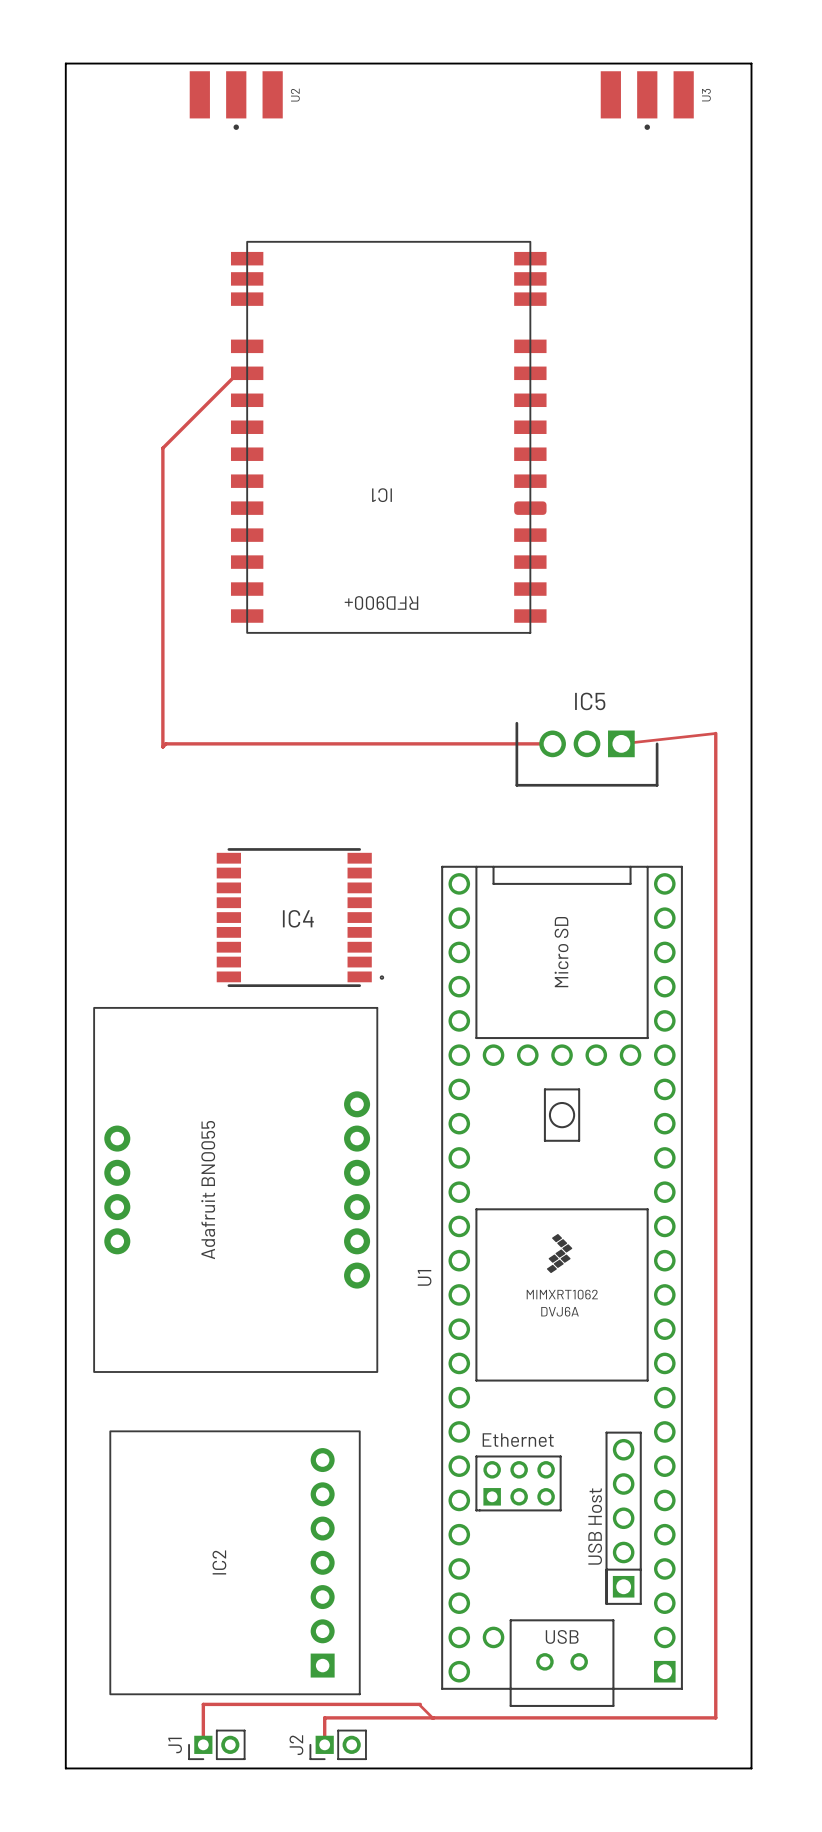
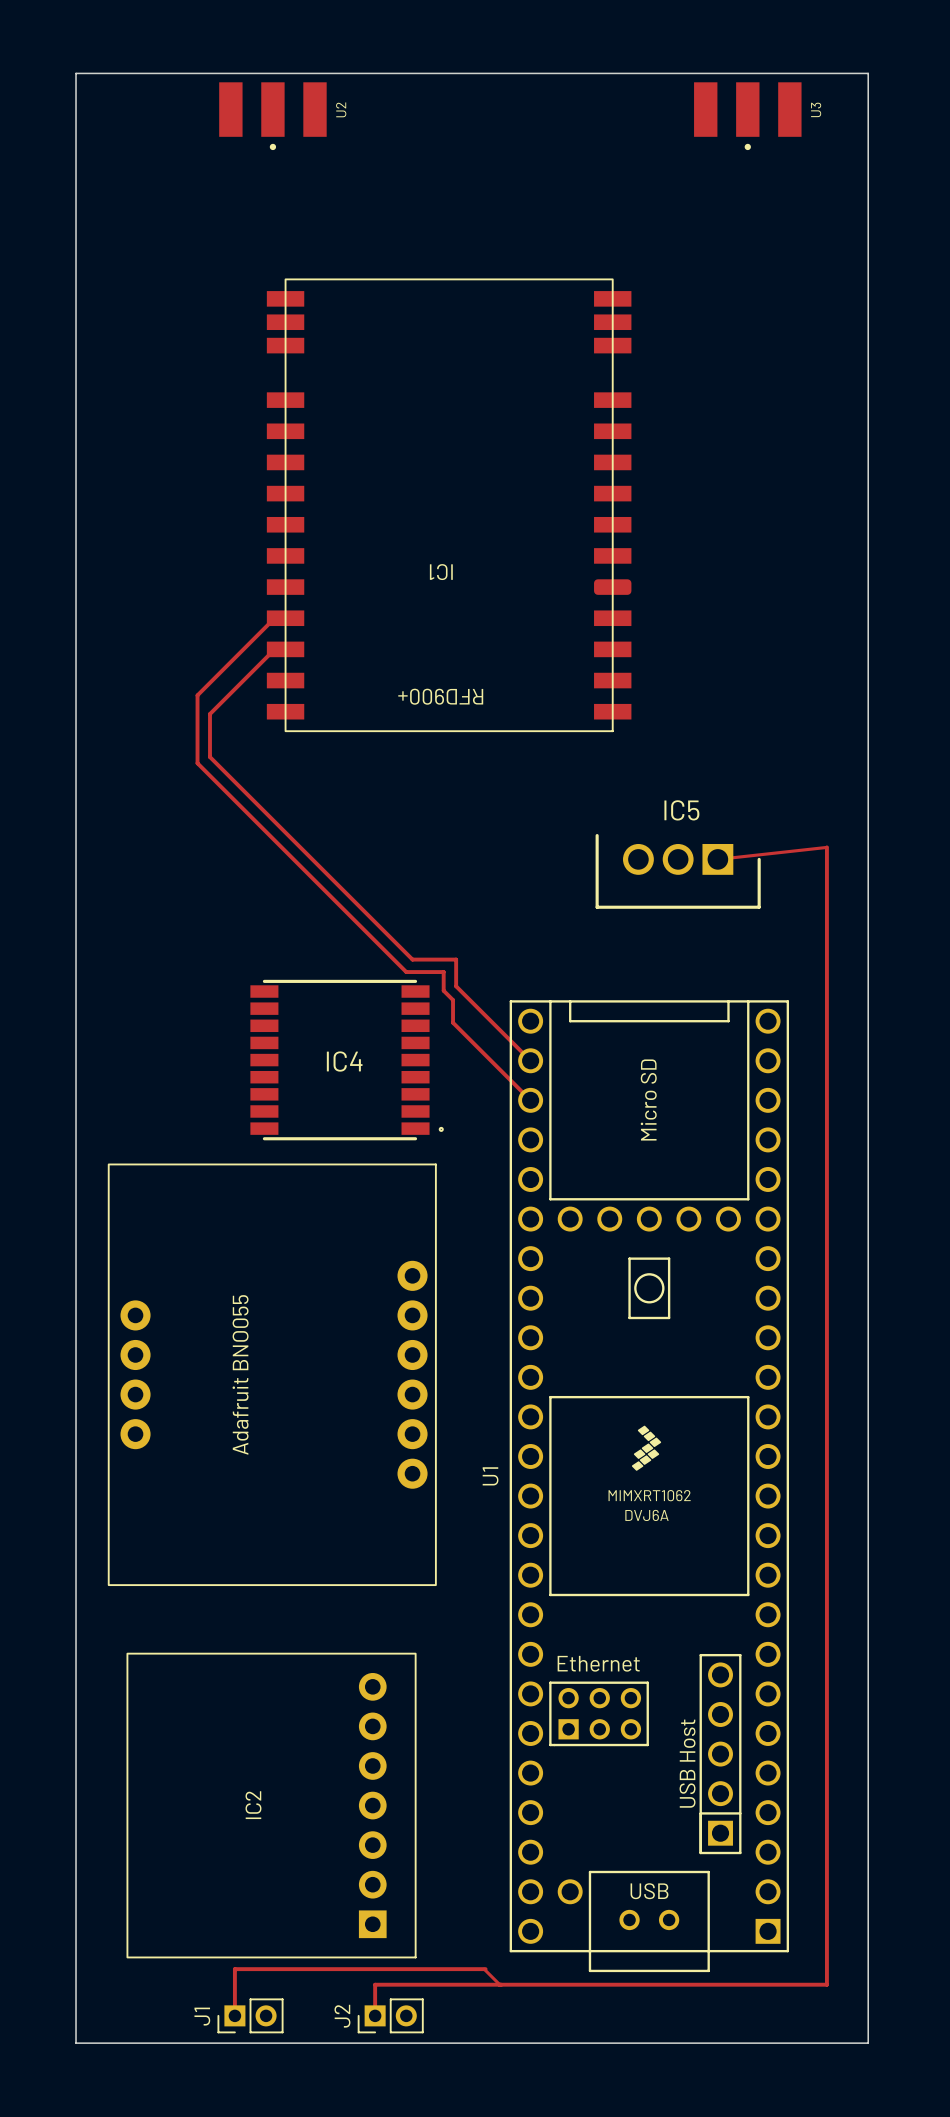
track: (237, 373) (162, 448) (162, 746) (165, 743) (552, 743) -> none
track: none -> (285, 618) (274, 618) (197, 695) (197, 763) (406, 972) (443, 972) (443, 990) (453, 1000) (453, 1022) (530, 1100)
track: none -> (285, 649) (274, 649) (209, 714) (209, 757) (412, 959) (456, 959) (456, 986) (530, 1060)

